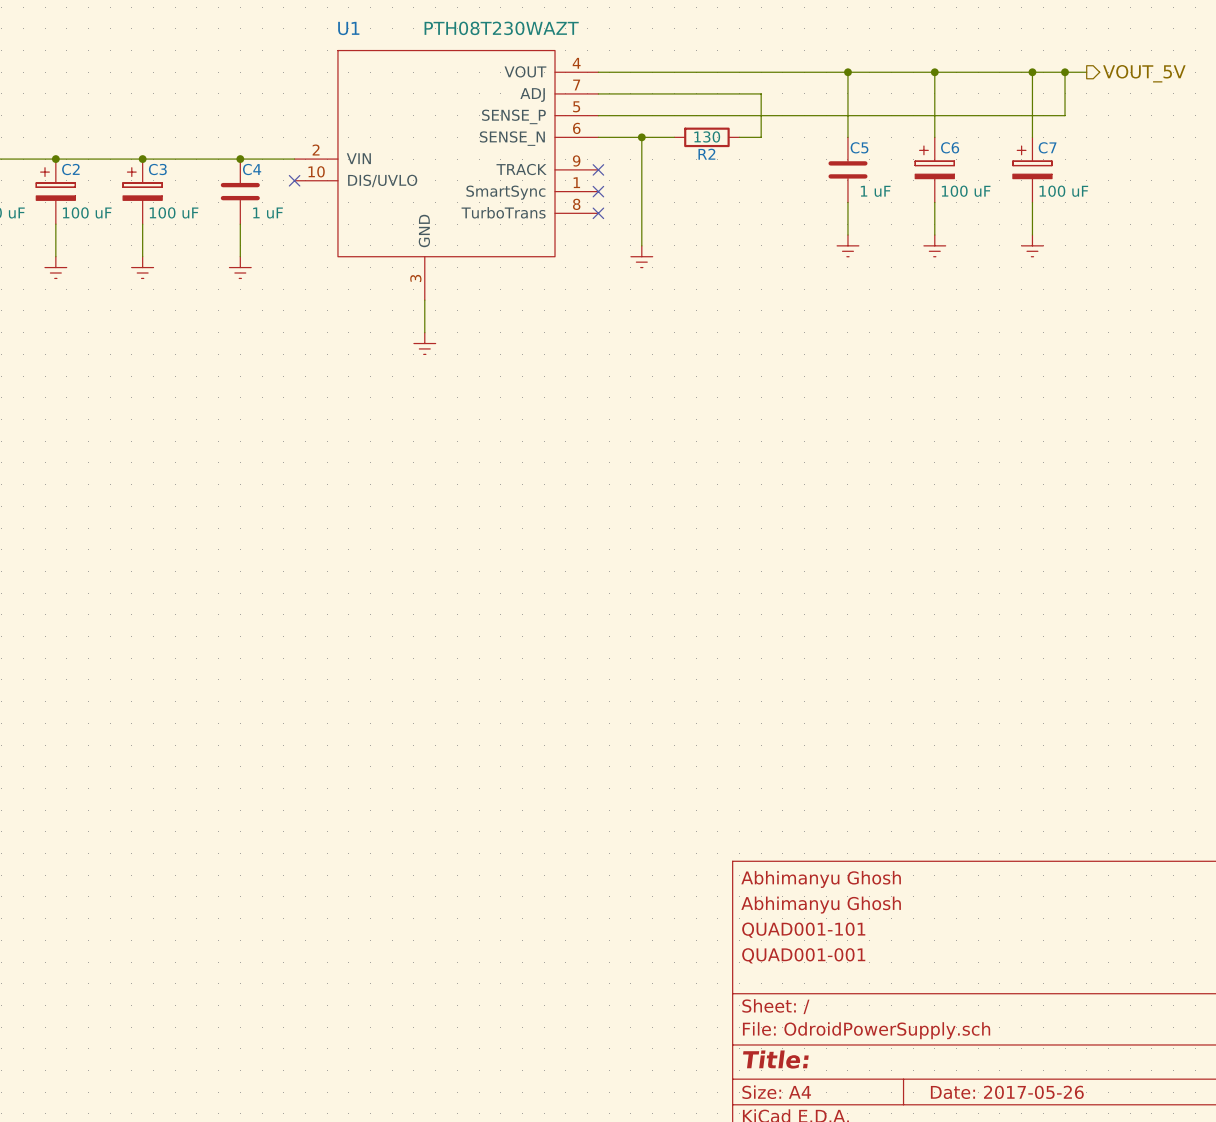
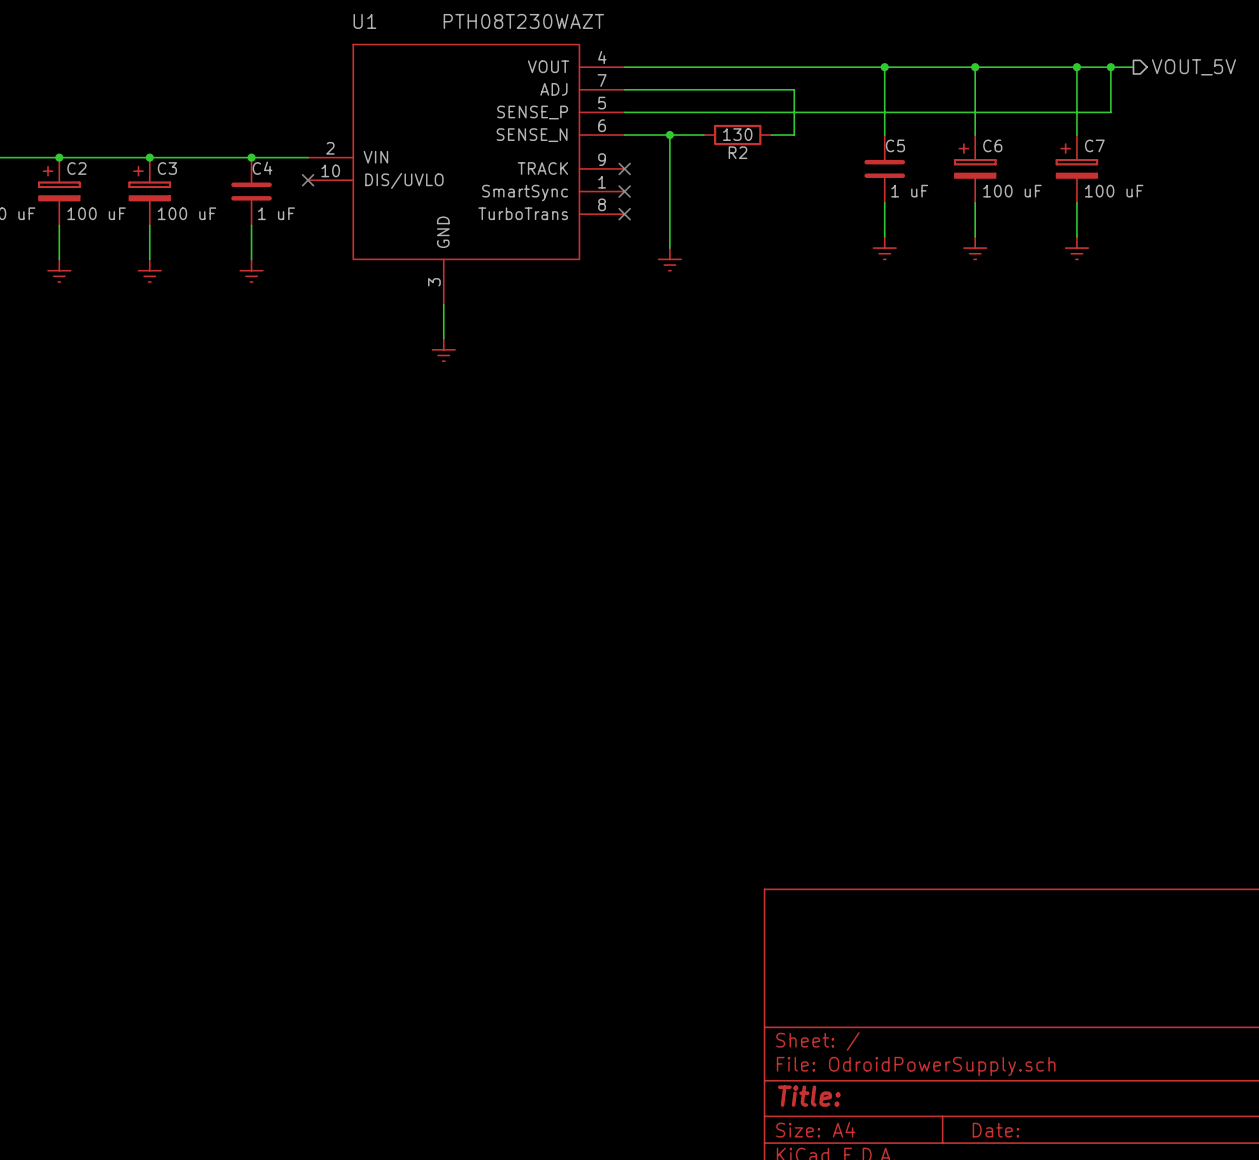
title block: Abhimanyu Ghosh (821, 879) -> none
title block: Abhimanyu Ghosh (821, 905) -> none
title block: QUAD001-101 (803, 930) -> none
title block: QUAD001-001 (803, 955) -> none
title block: Date: 2017-05-26 (1007, 1092) -> Date: (995, 1130)

